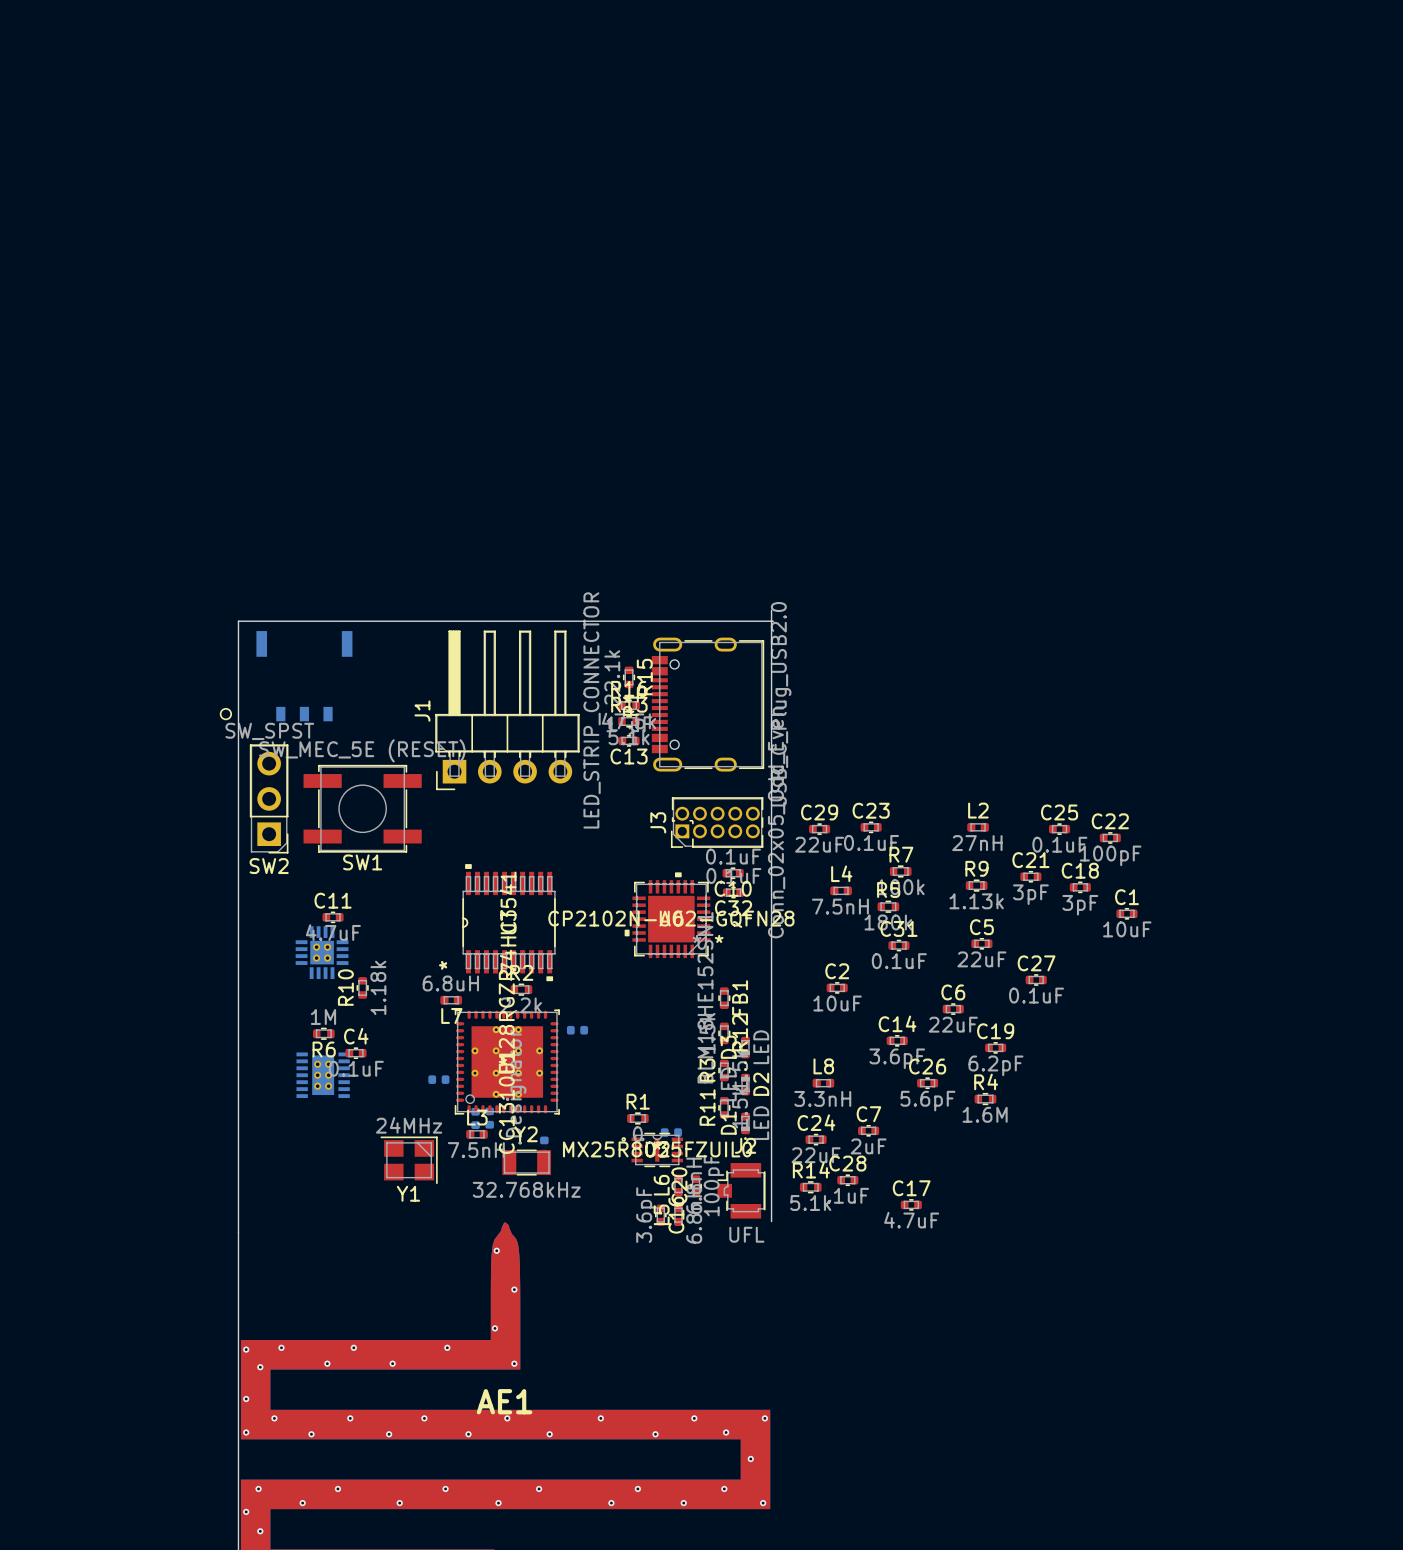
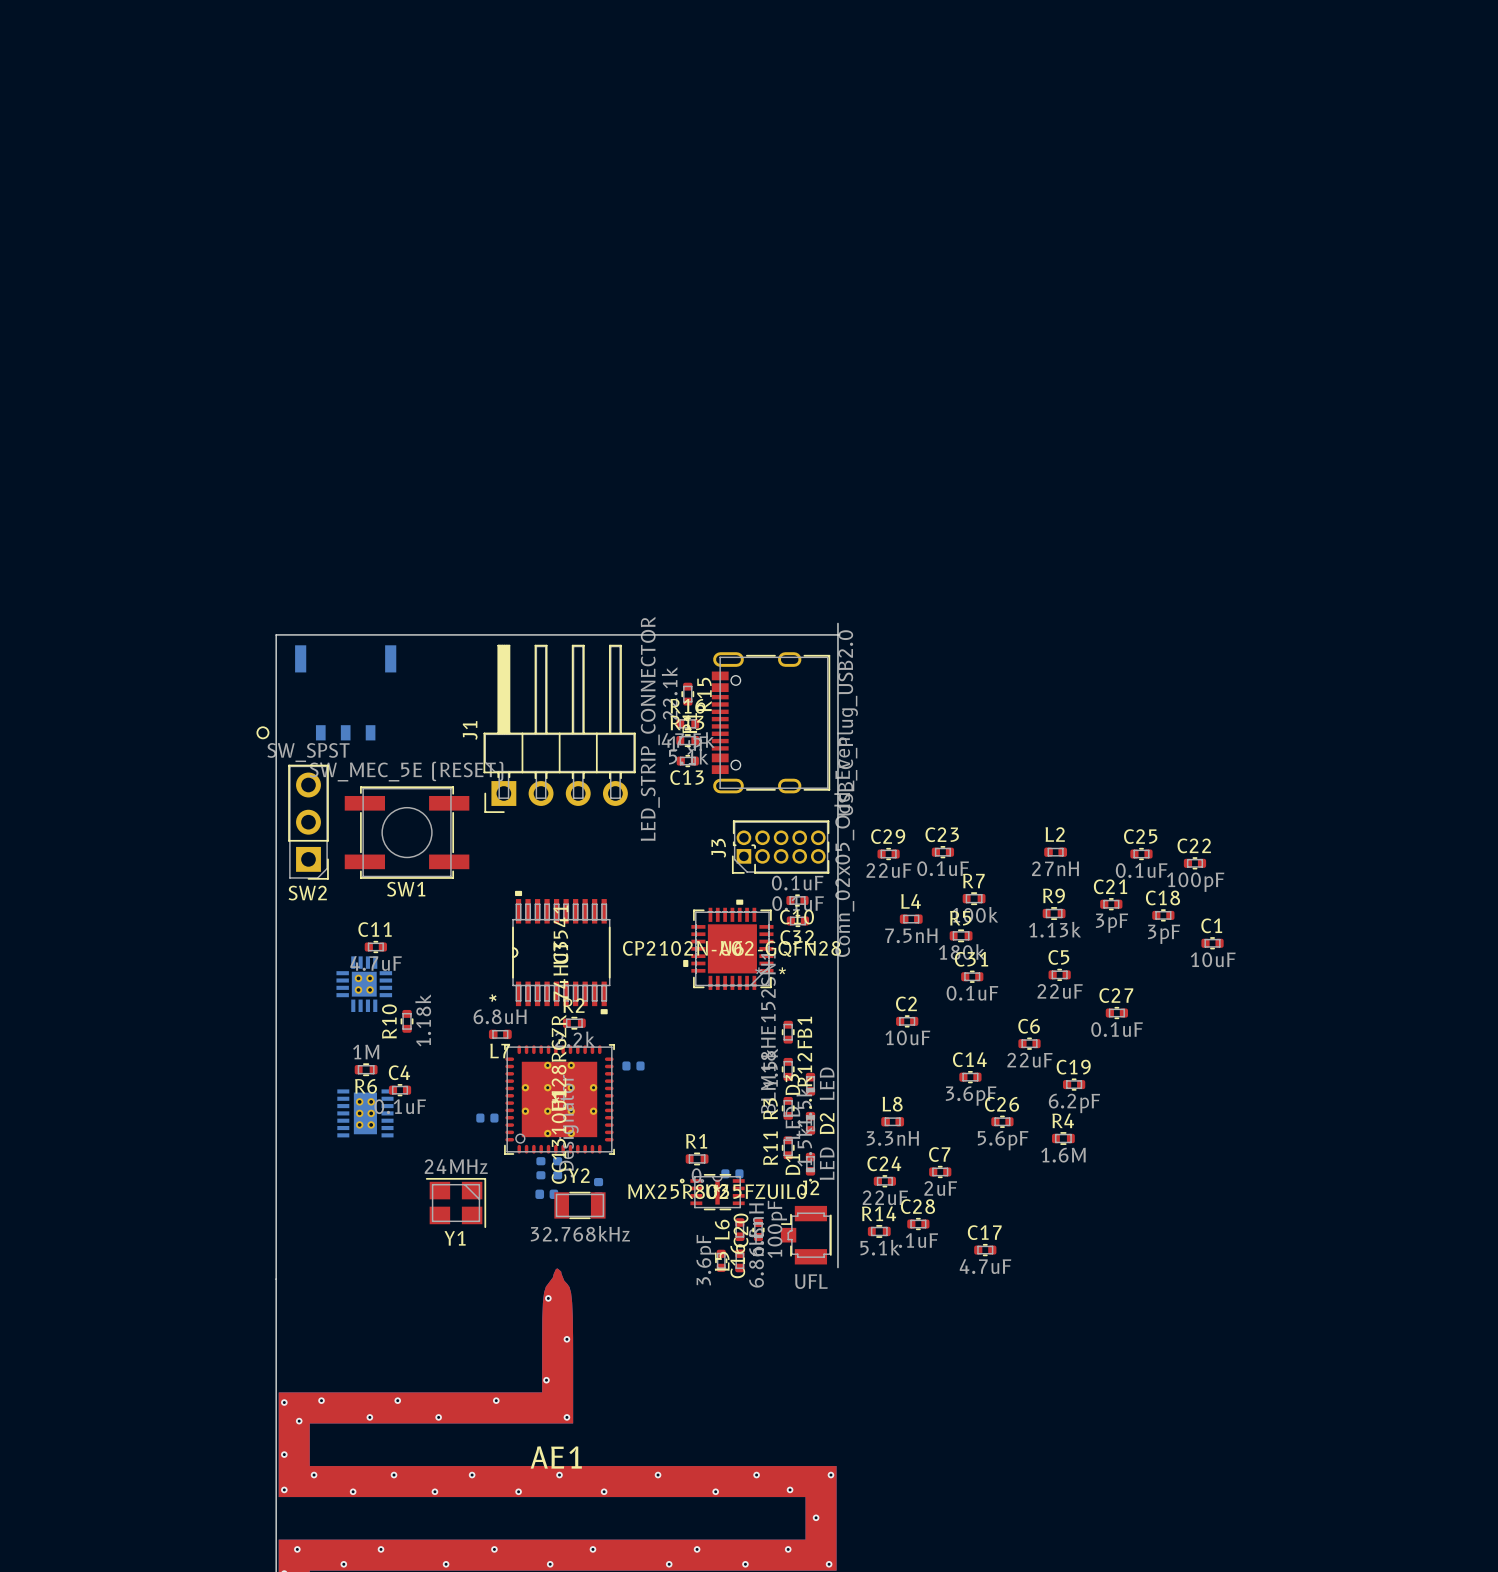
part: (475, 1118) -> none
part: (489, 1118) -> none
part: none -> (540, 1168)
part: none -> (557, 1168)
L3 side: top (477, 1134) -> bottom (546, 1194)

